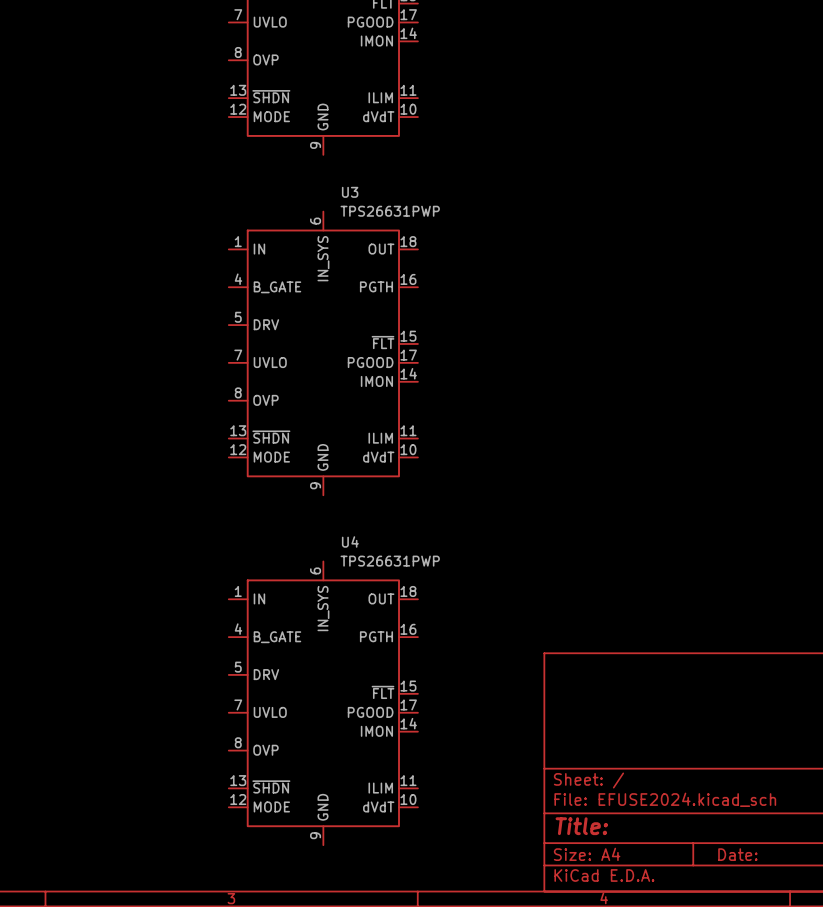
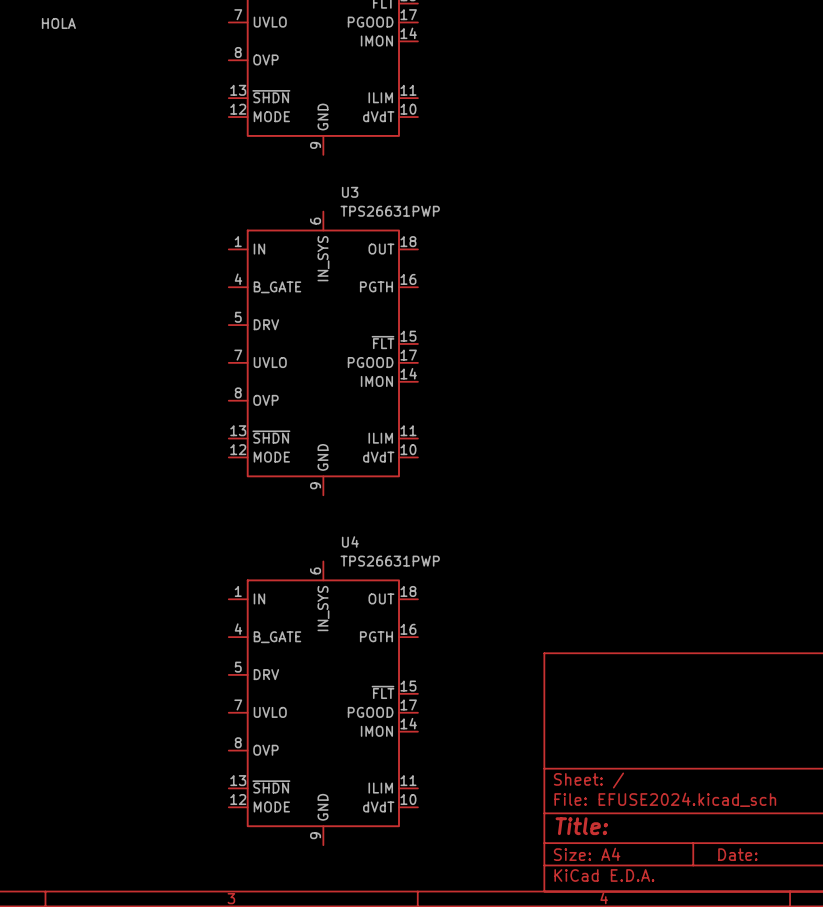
label: none -> HOLA (58, 23)

